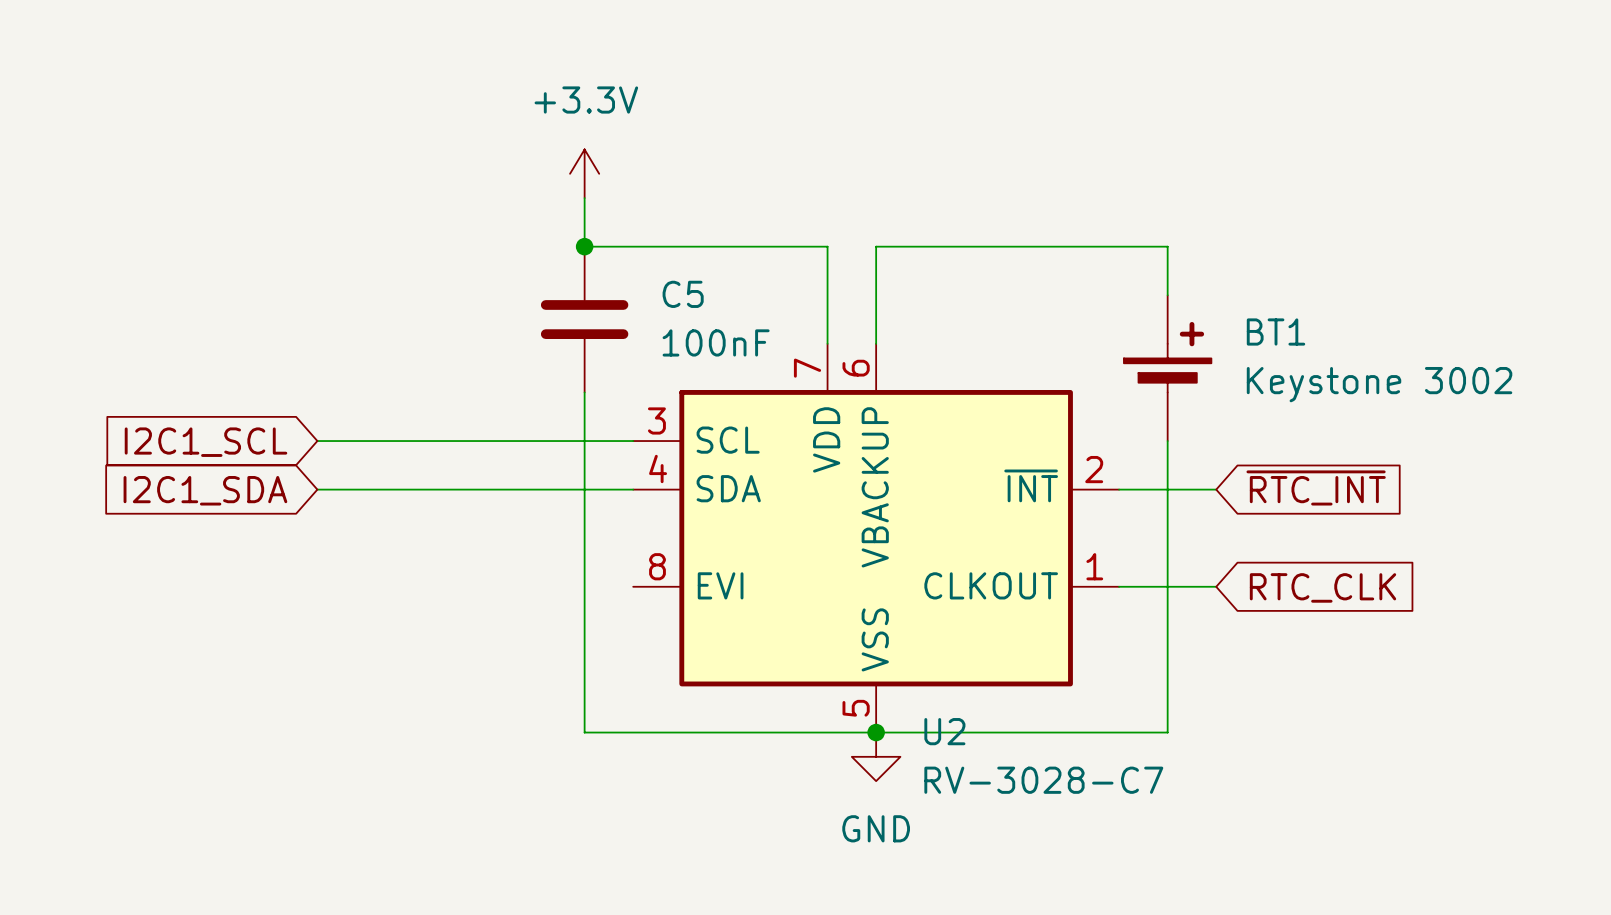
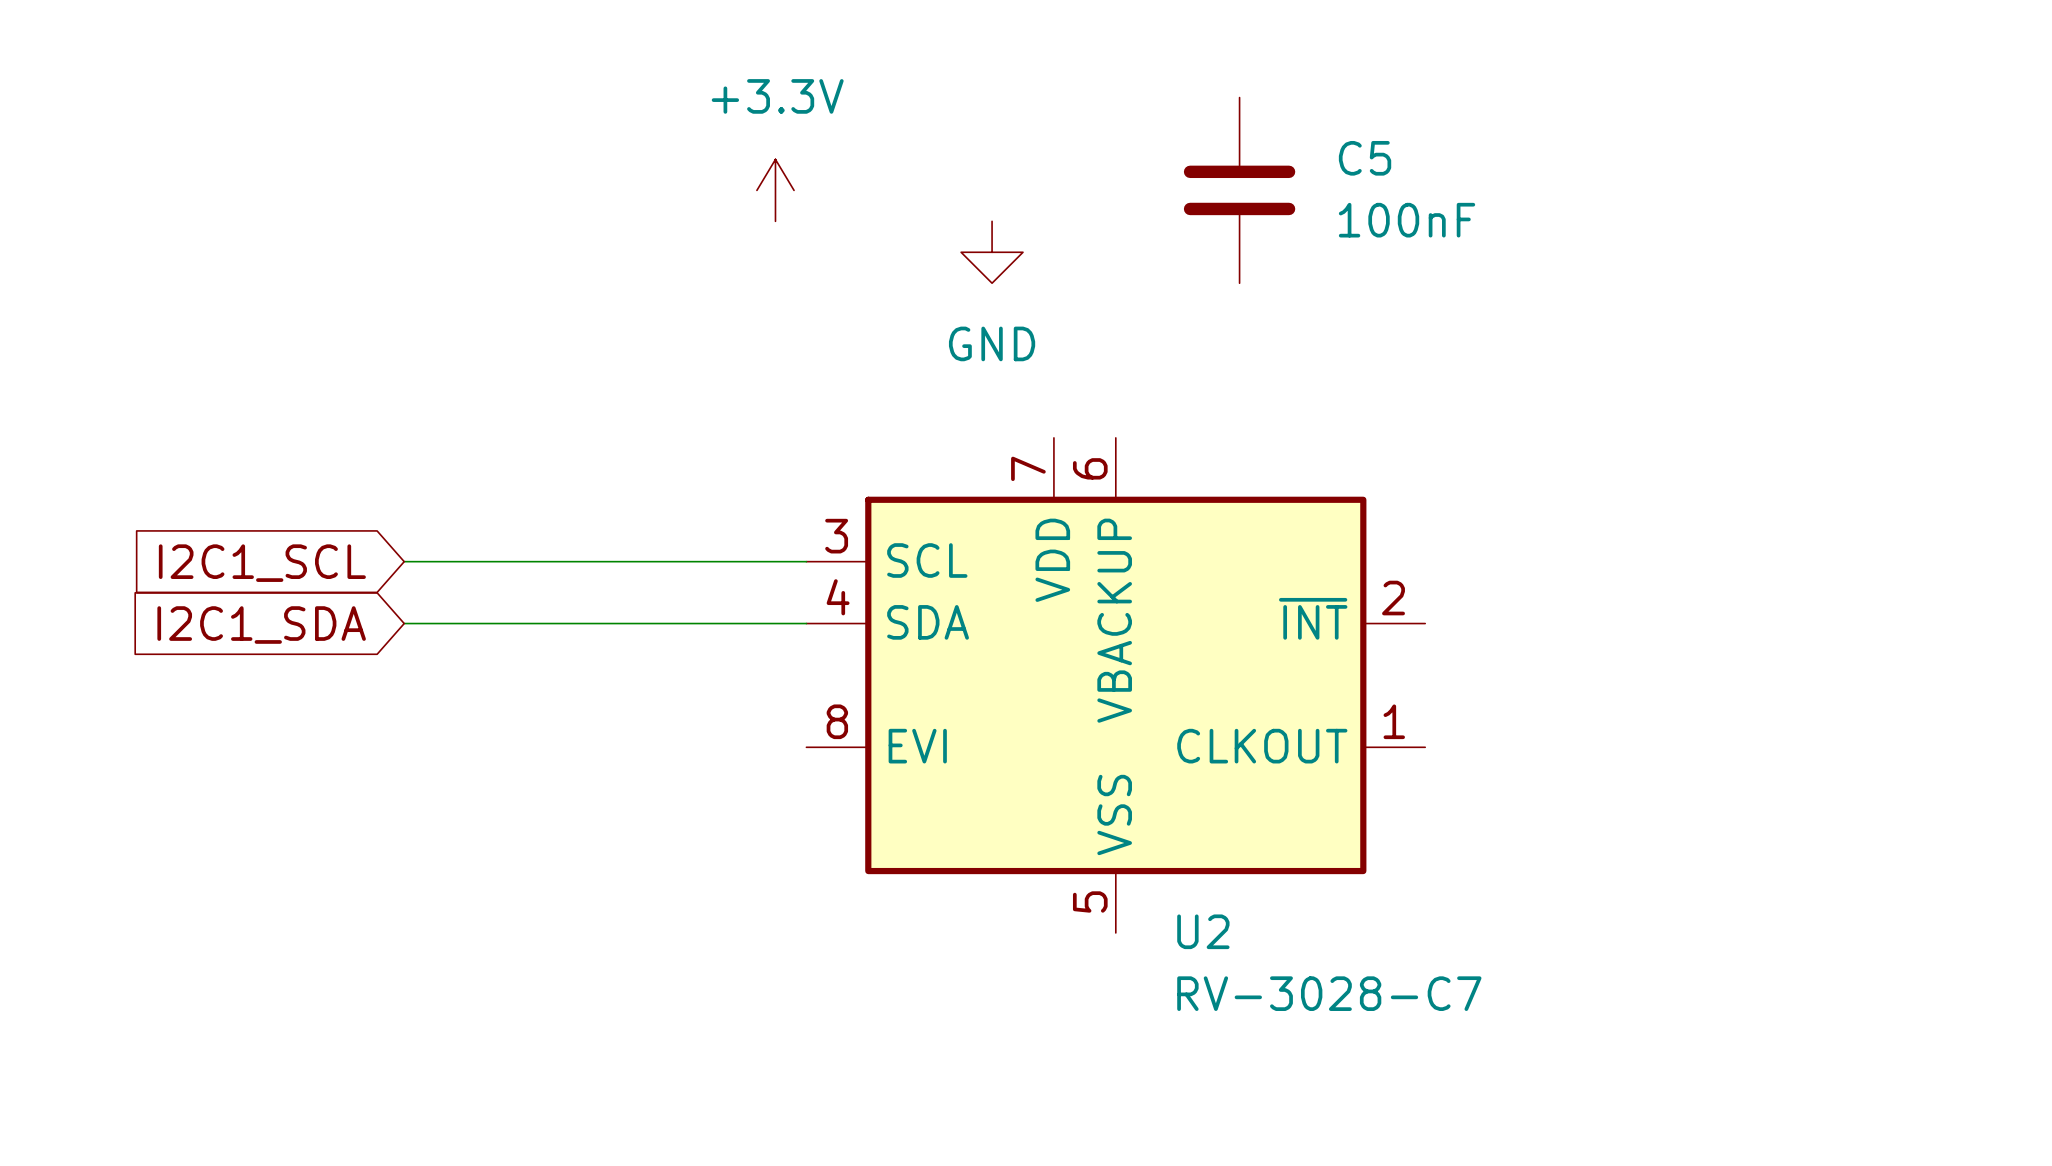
power symbol position: +3.3V (584, 173) -> +3.3V (775, 190)
wire: (584, 198) (584, 246) (827, 246) (827, 343) -> none
power symbol: none -> GND (992, 252)
junction: (584, 246) -> none
wire: (1167, 295) (1167, 246) (876, 246) (876, 343) -> none
C5 position: (584, 319) -> (1239, 190)
BT1: Keystone 3002 (1167, 368) -> none
wire: (584, 392) (584, 732) (1167, 732) (1167, 441) -> none
global label: ~{RTC_INT} (1316, 487) -> none
wire: (1119, 489) (1216, 489) -> none
wire: (1119, 586) (1216, 586) -> none
global label: RTC_CLK (1323, 587) -> none
junction: (876, 732) -> none
power symbol: GND (876, 756) -> none

